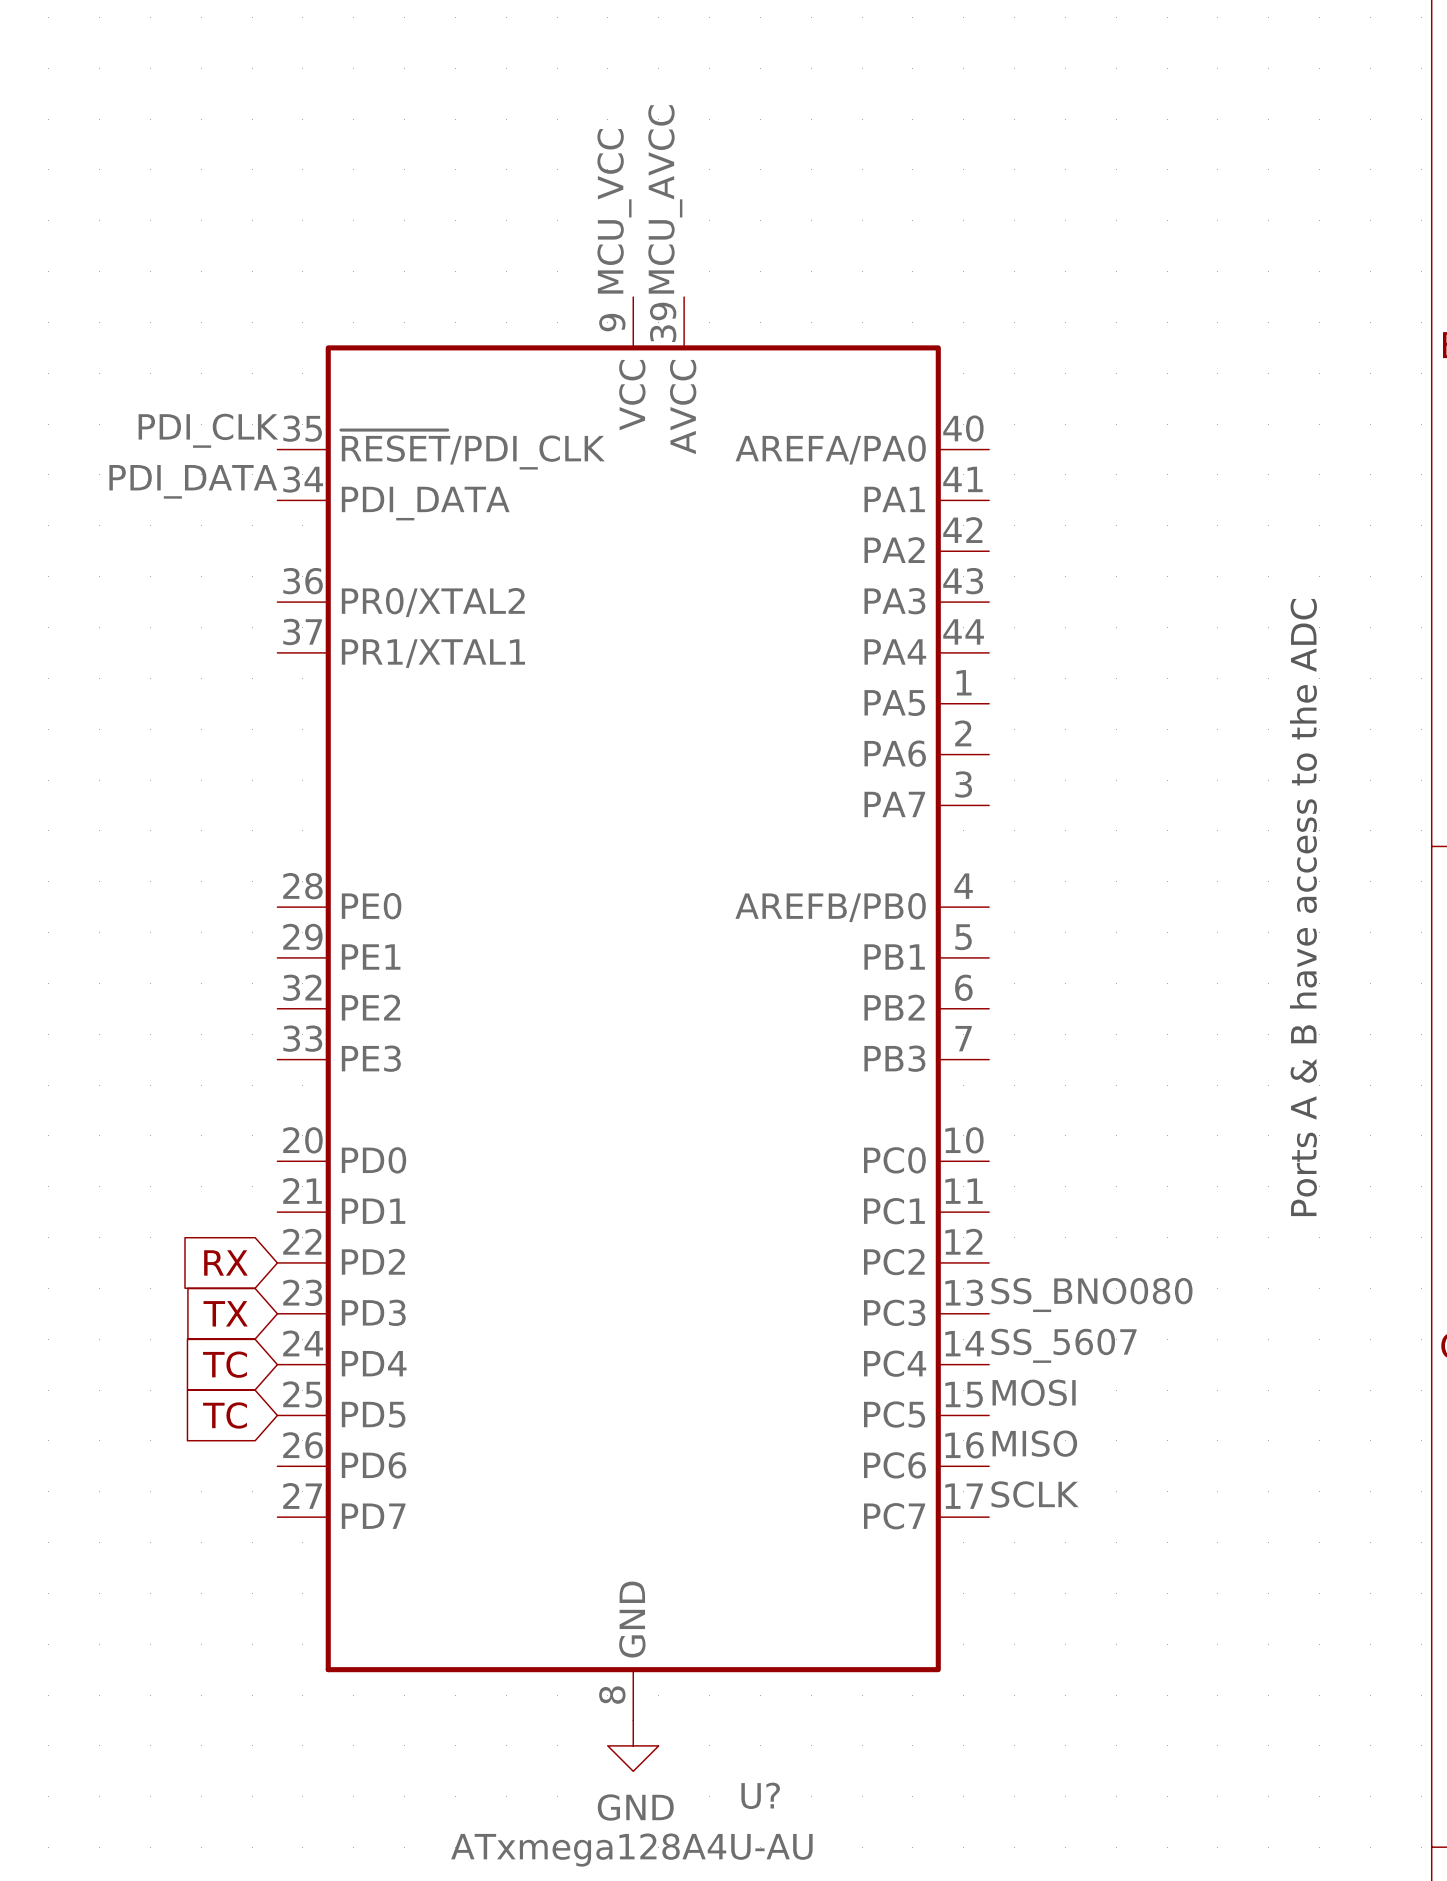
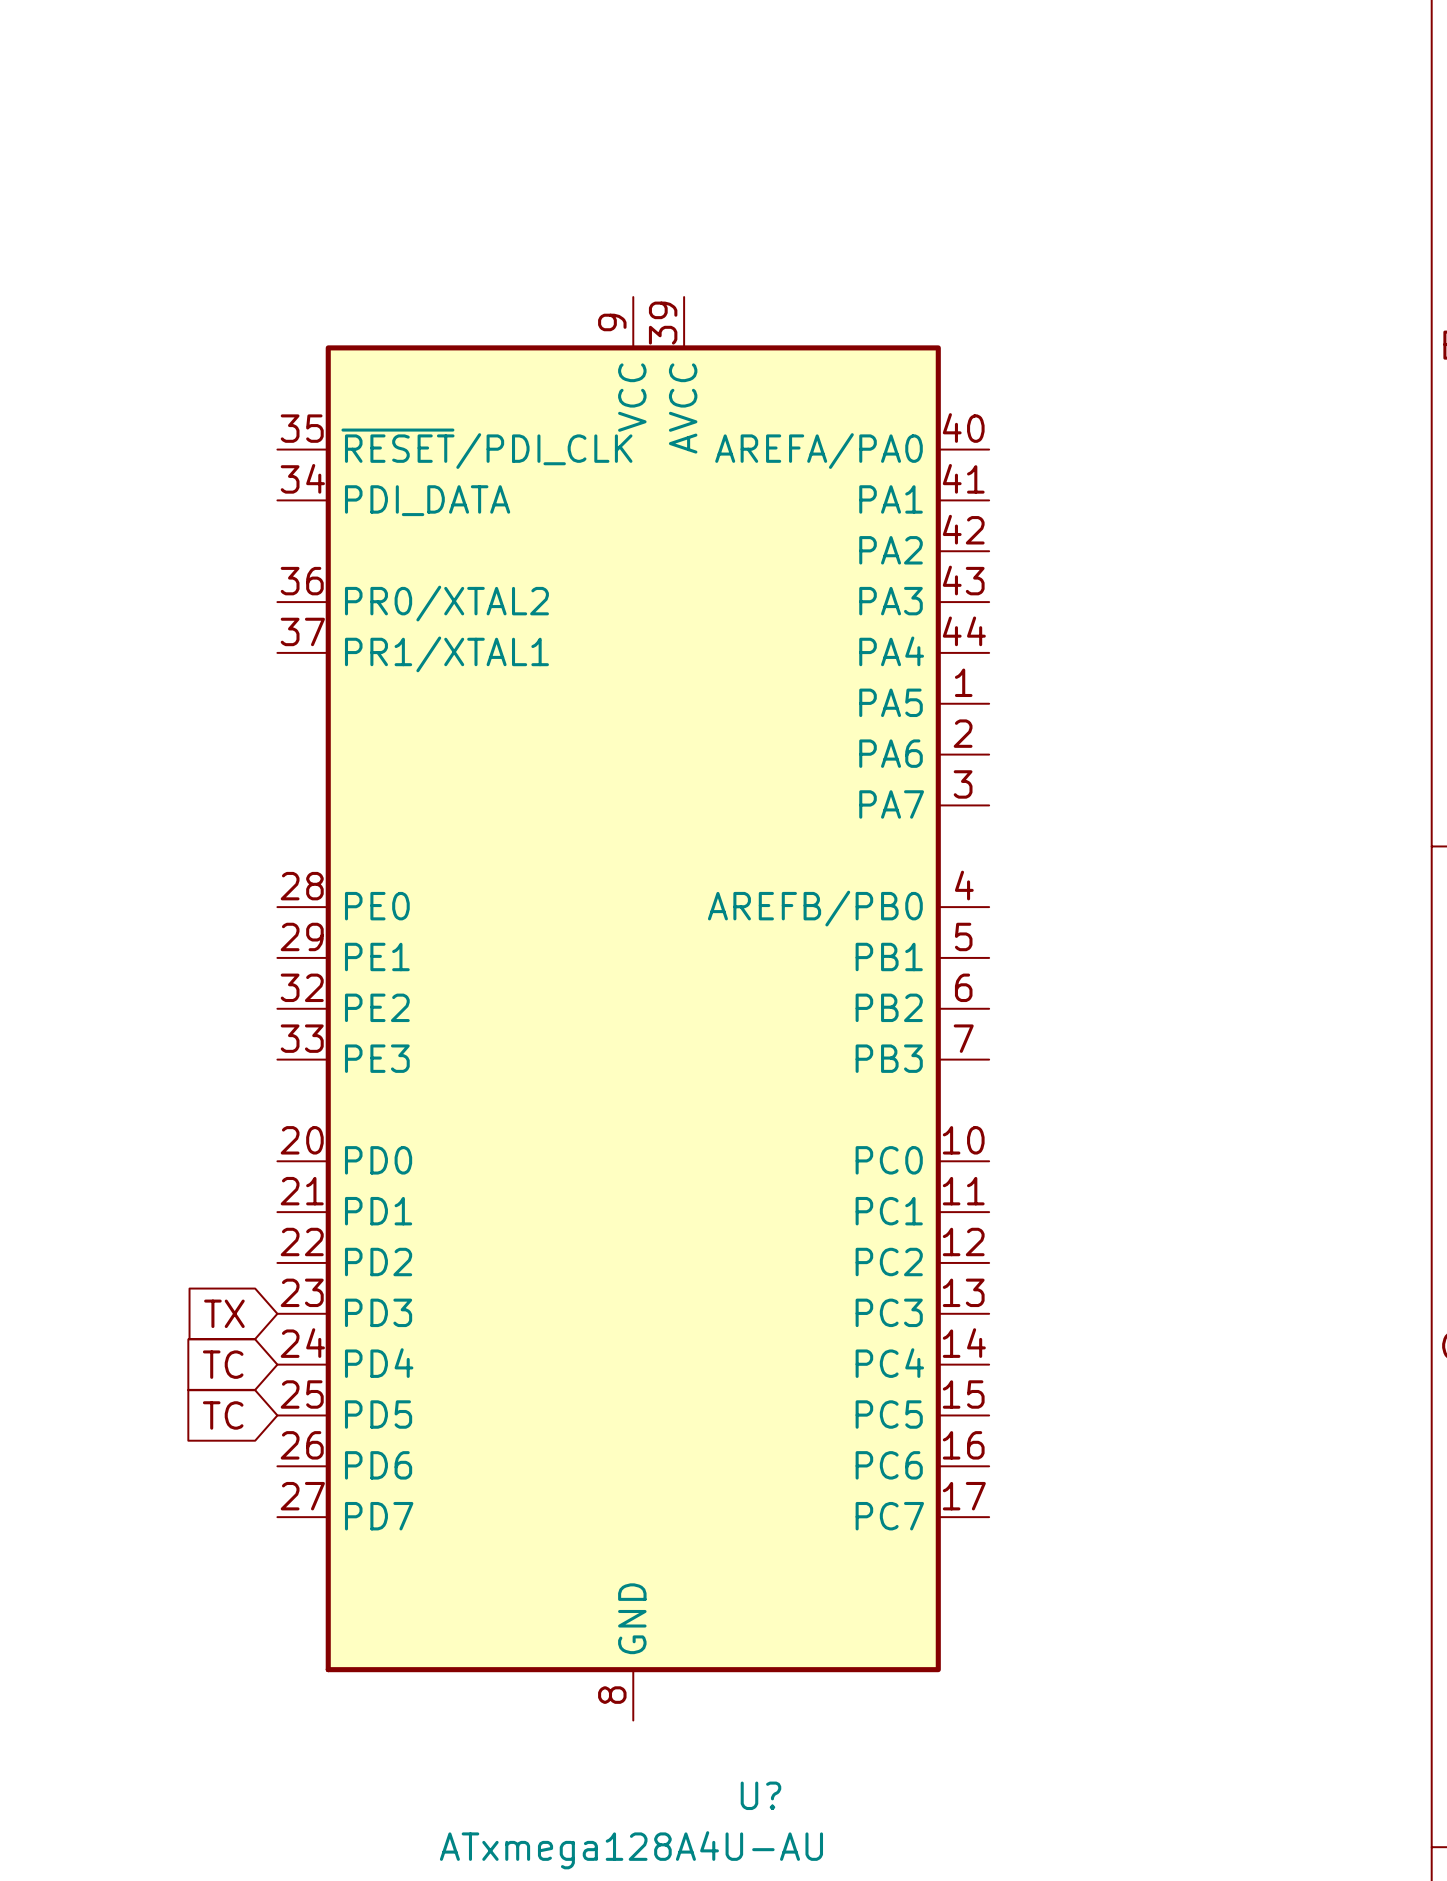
label: MCU_AVCC (665, 199) -> none
label: MCU_VCC (614, 211) -> none
label: PDI_CLK (208, 430) -> none
label: PDI_DATA (193, 481) -> none
text: Ports A & B have access to the ADC (1303, 907) -> none
global label: RX (225, 1262) -> none
label: SS_BNO080 (1091, 1294) -> none
label: SS_5607 (1064, 1345) -> none
label: MOSI (1034, 1392) -> none
label: MISO (1034, 1443) -> none
label: SCLK (1035, 1494) -> none
power symbol: GND (633, 1745) -> none

